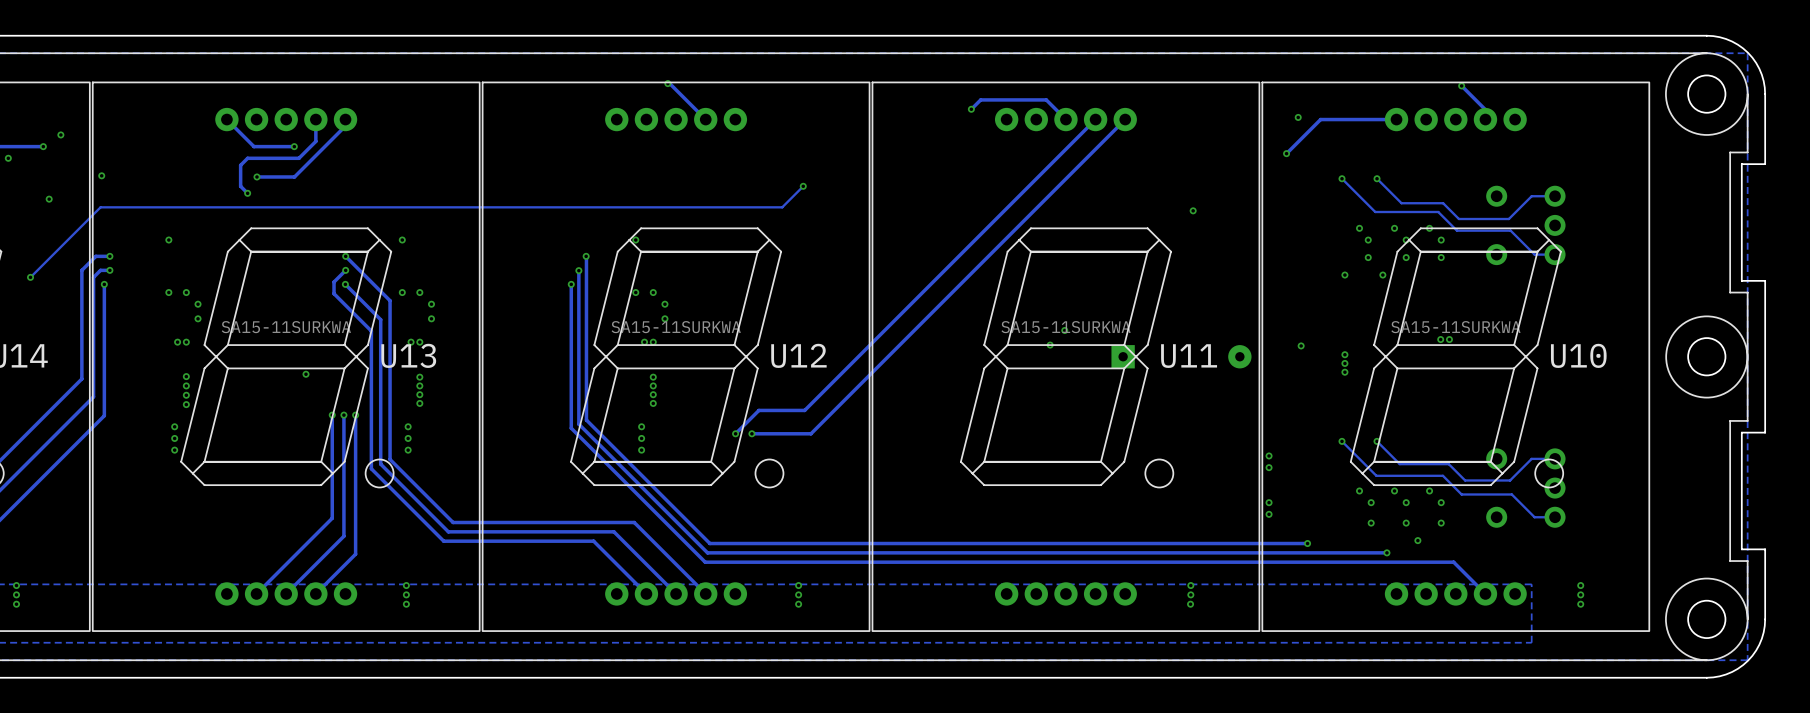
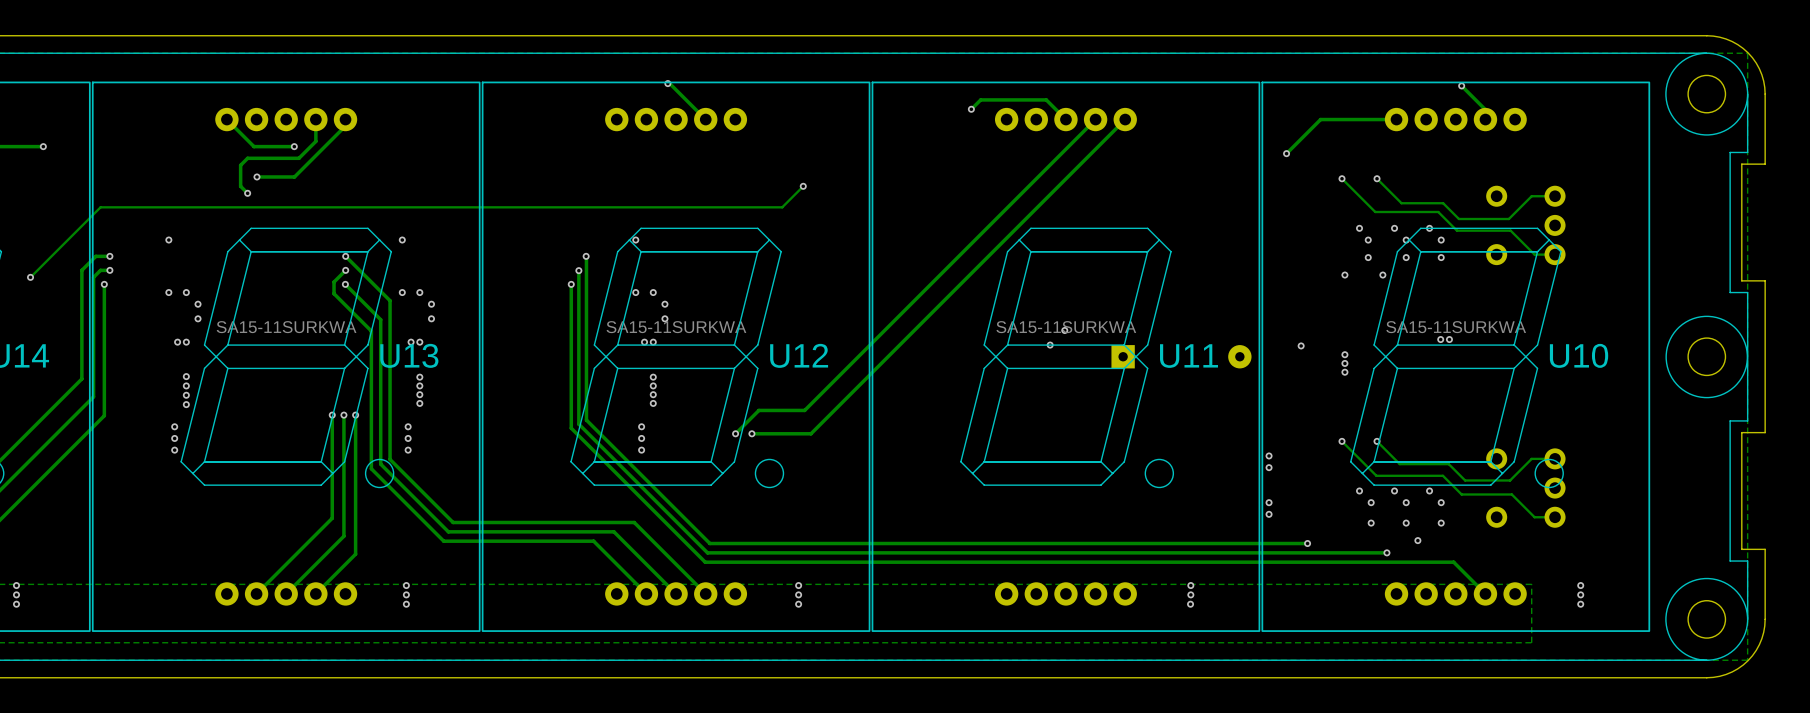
via: (1298, 117) -> none
via: (60, 134) -> none
via: (8, 158) -> none
via: (101, 175) -> none
via: (49, 199) -> none
via: (1193, 210) -> none
via: (306, 374) -> none

